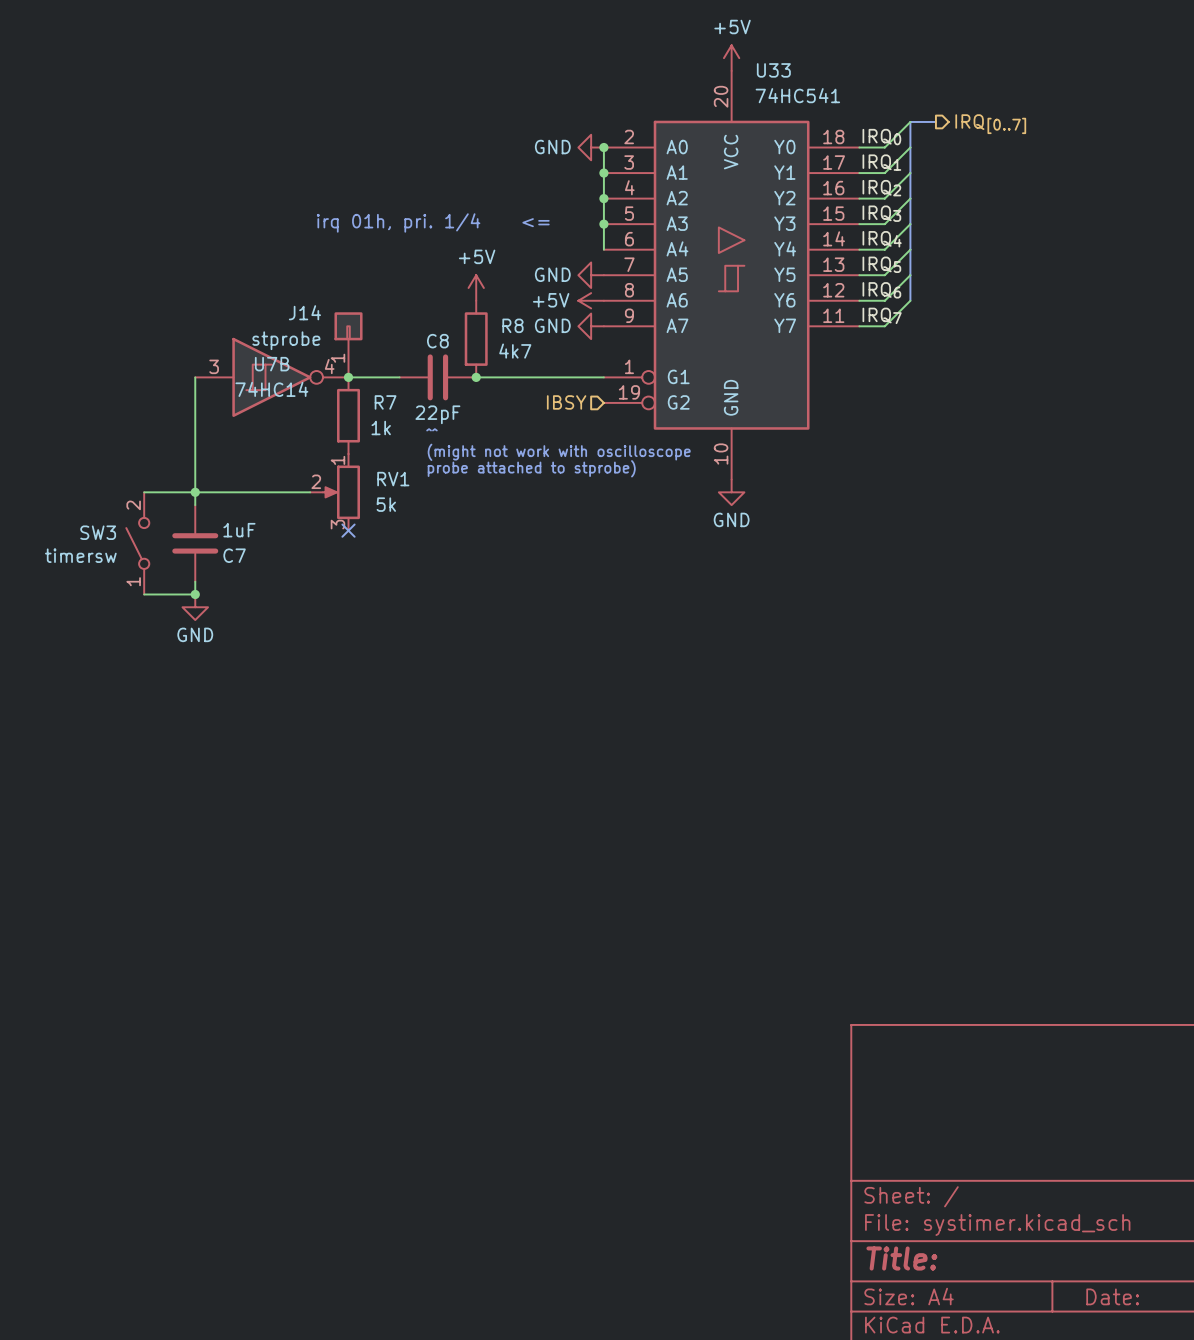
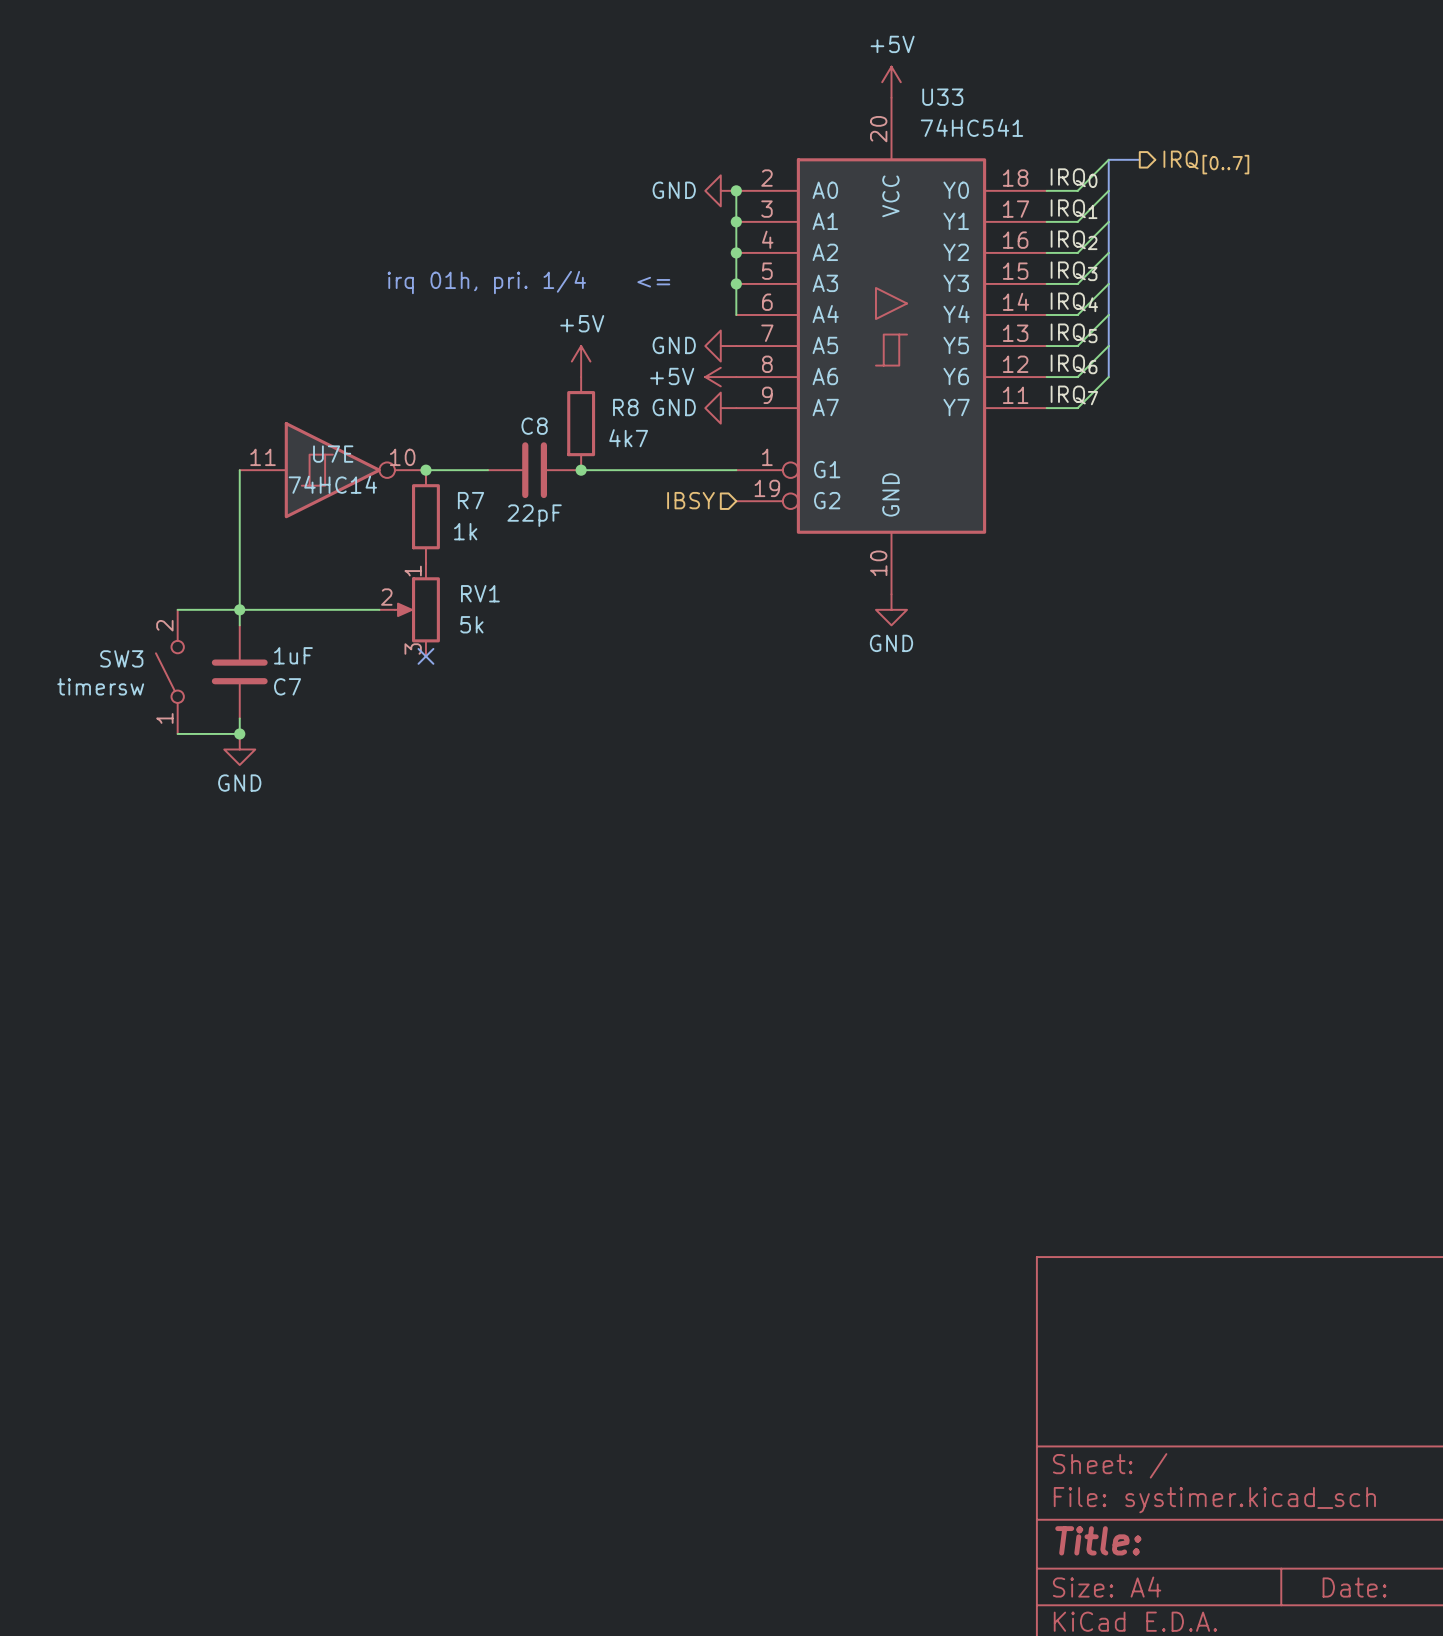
J14: stprobe (348, 344) -> none
U7B name: U7B (272, 364) -> U7E (333, 454)
U7B pin number: 3 (214, 366) -> 11 (263, 457)
U7B pin number: 4 (329, 366) -> 10 (402, 457)
text: ^^ (431, 429) -> none
text: (might not work with oscilloscope (559, 452) -> none
text: probe attached to stprobe) (531, 468) -> none

